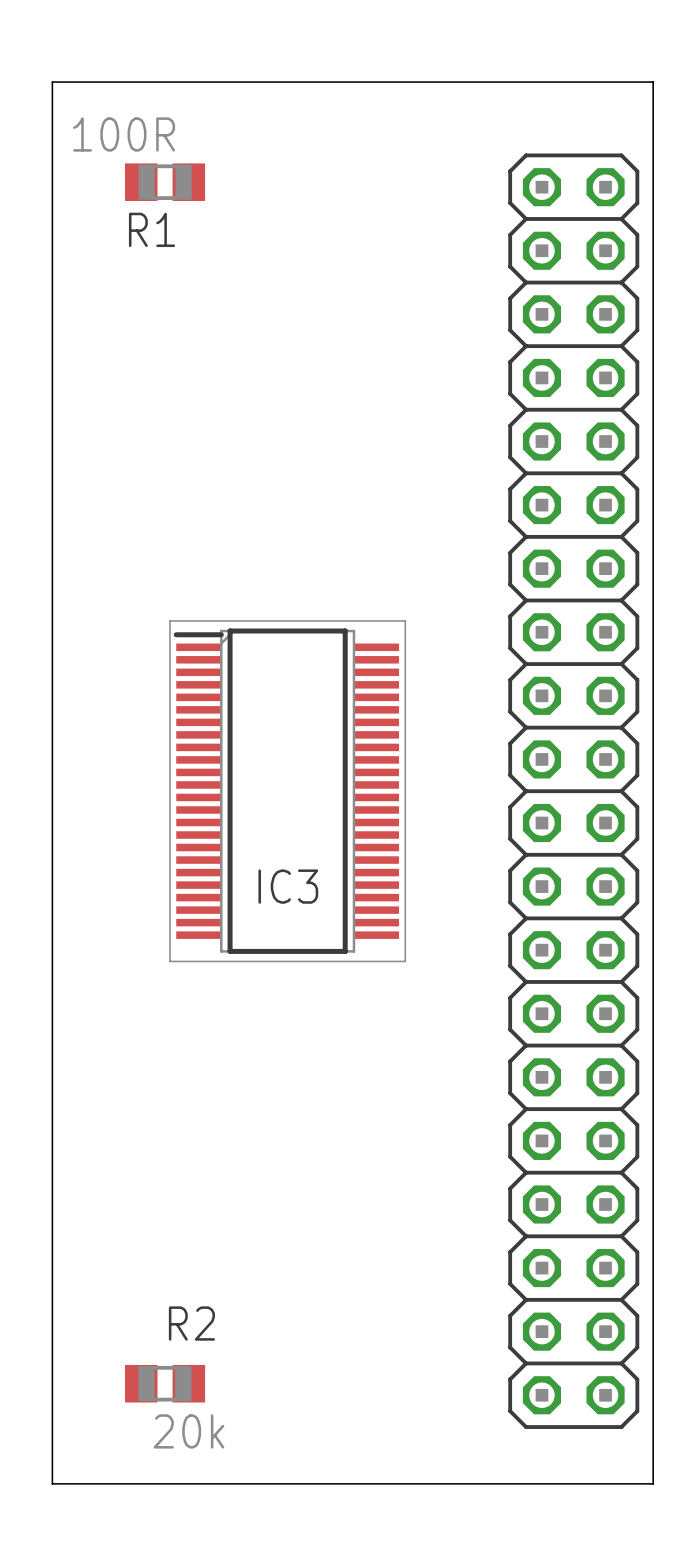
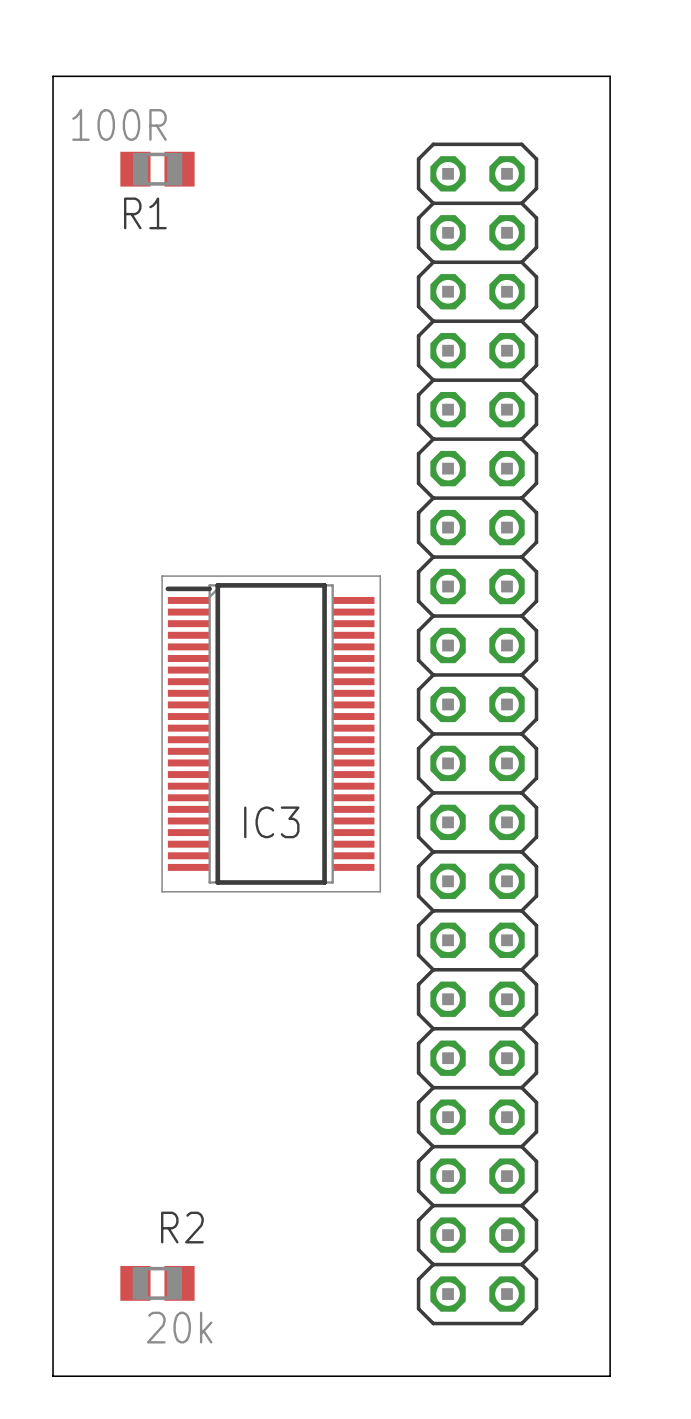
part position: (573, 791) -> (477, 733)

